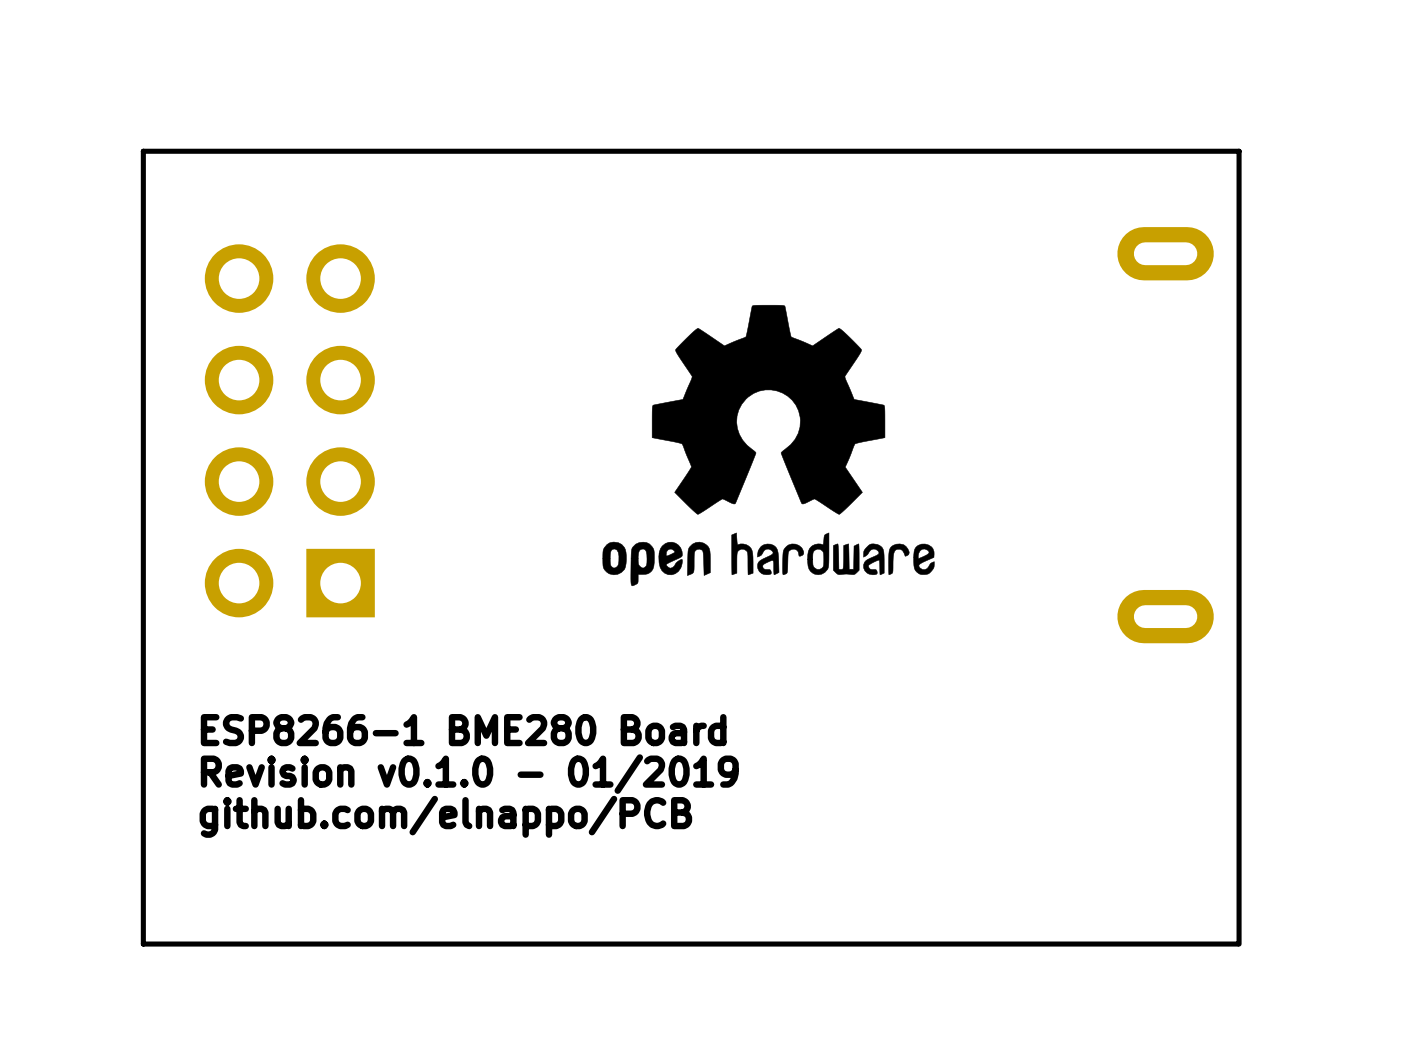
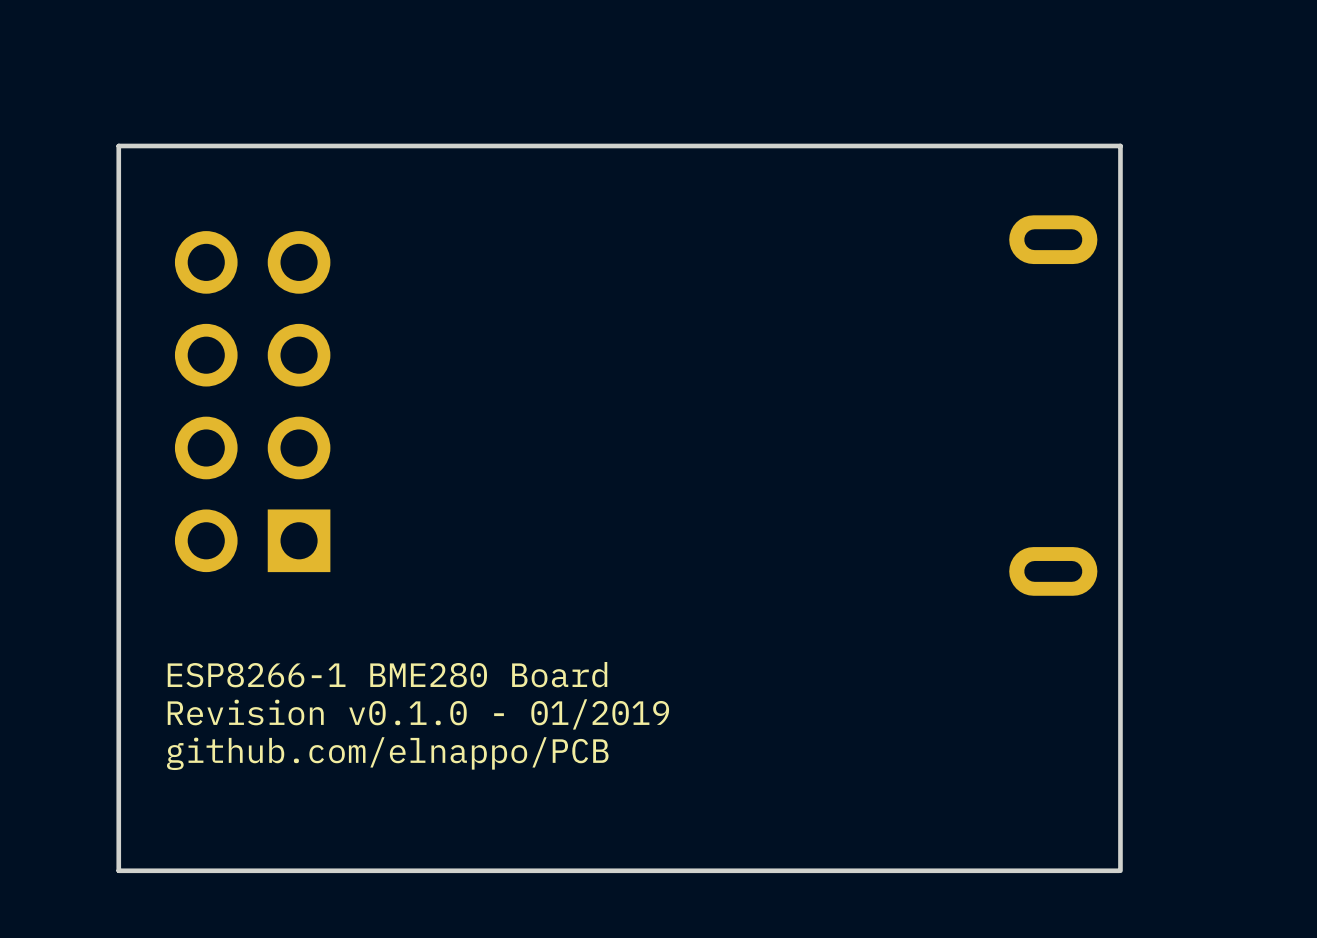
drawing: [602, 304, 935, 587] -> none

